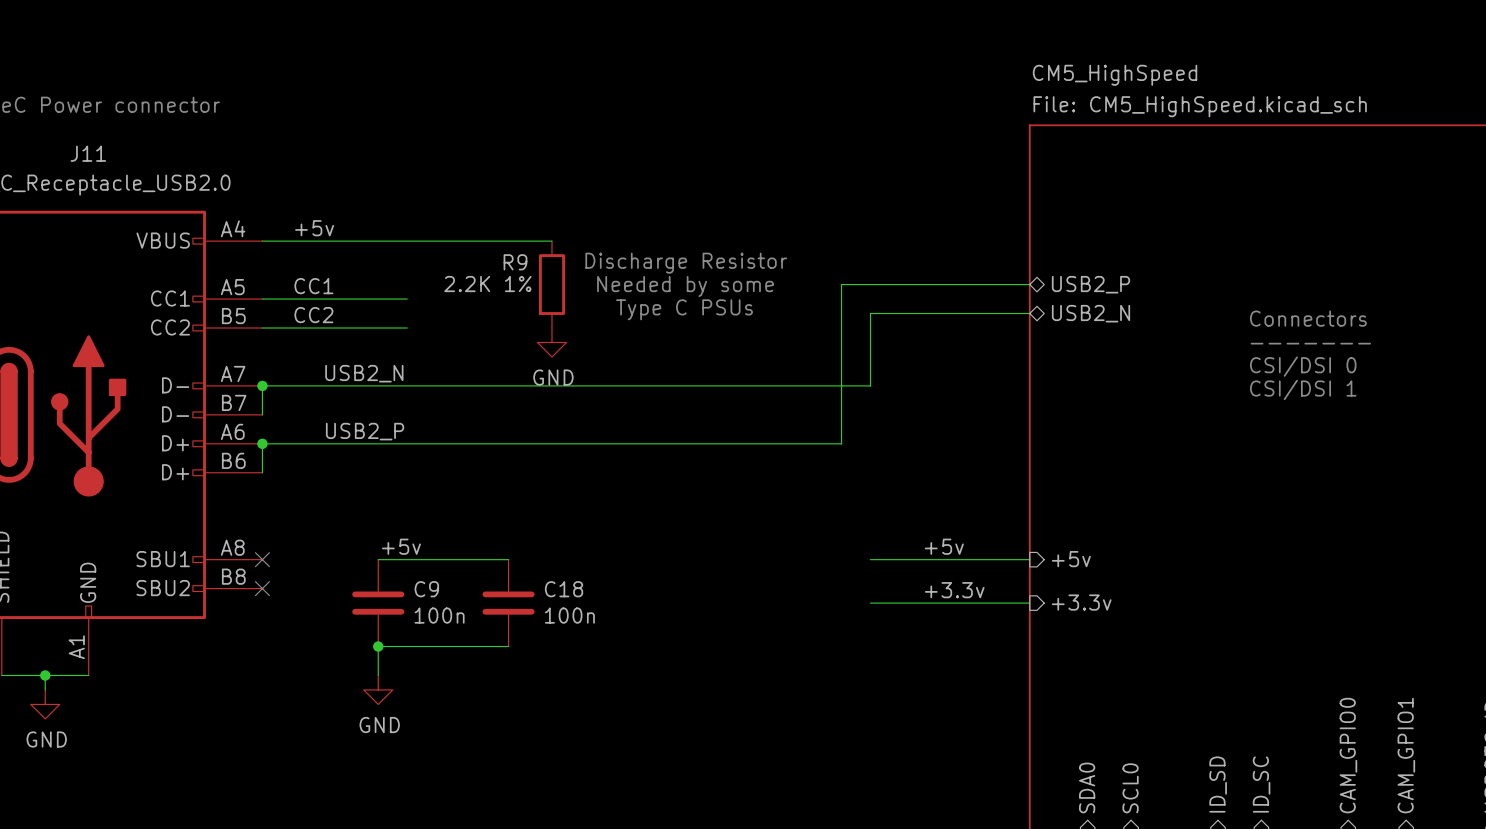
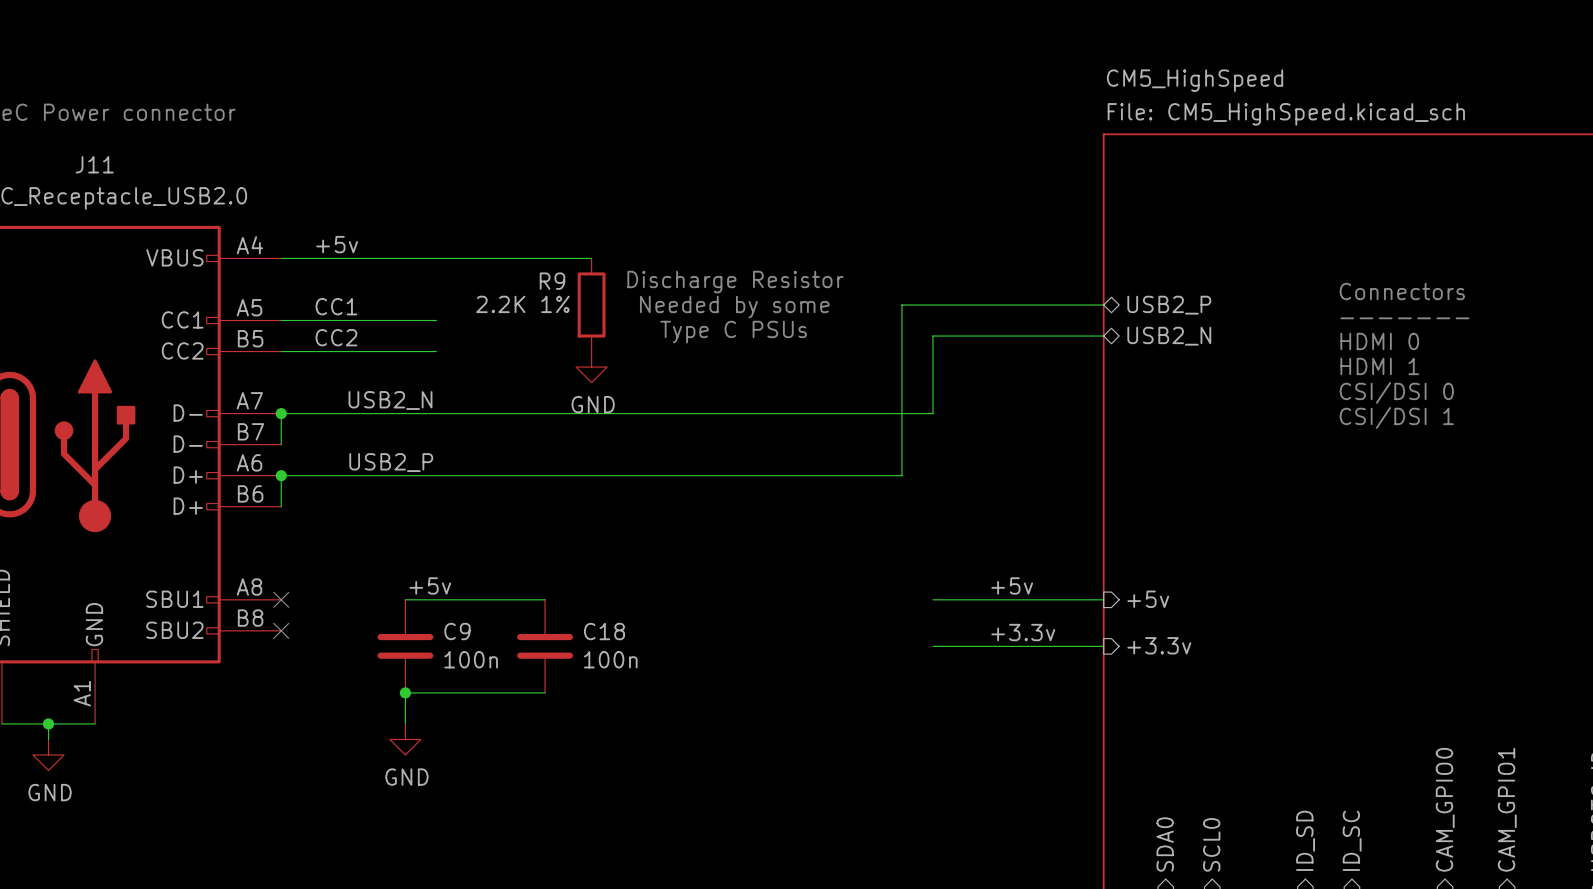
text: none -> Connectors (1402, 291)
text: none -> ------- (1404, 318)
text: Connectors (1308, 318) -> HDMI 0 (1379, 341)
text: ------- (1310, 343) -> HDMI 1 (1379, 366)

